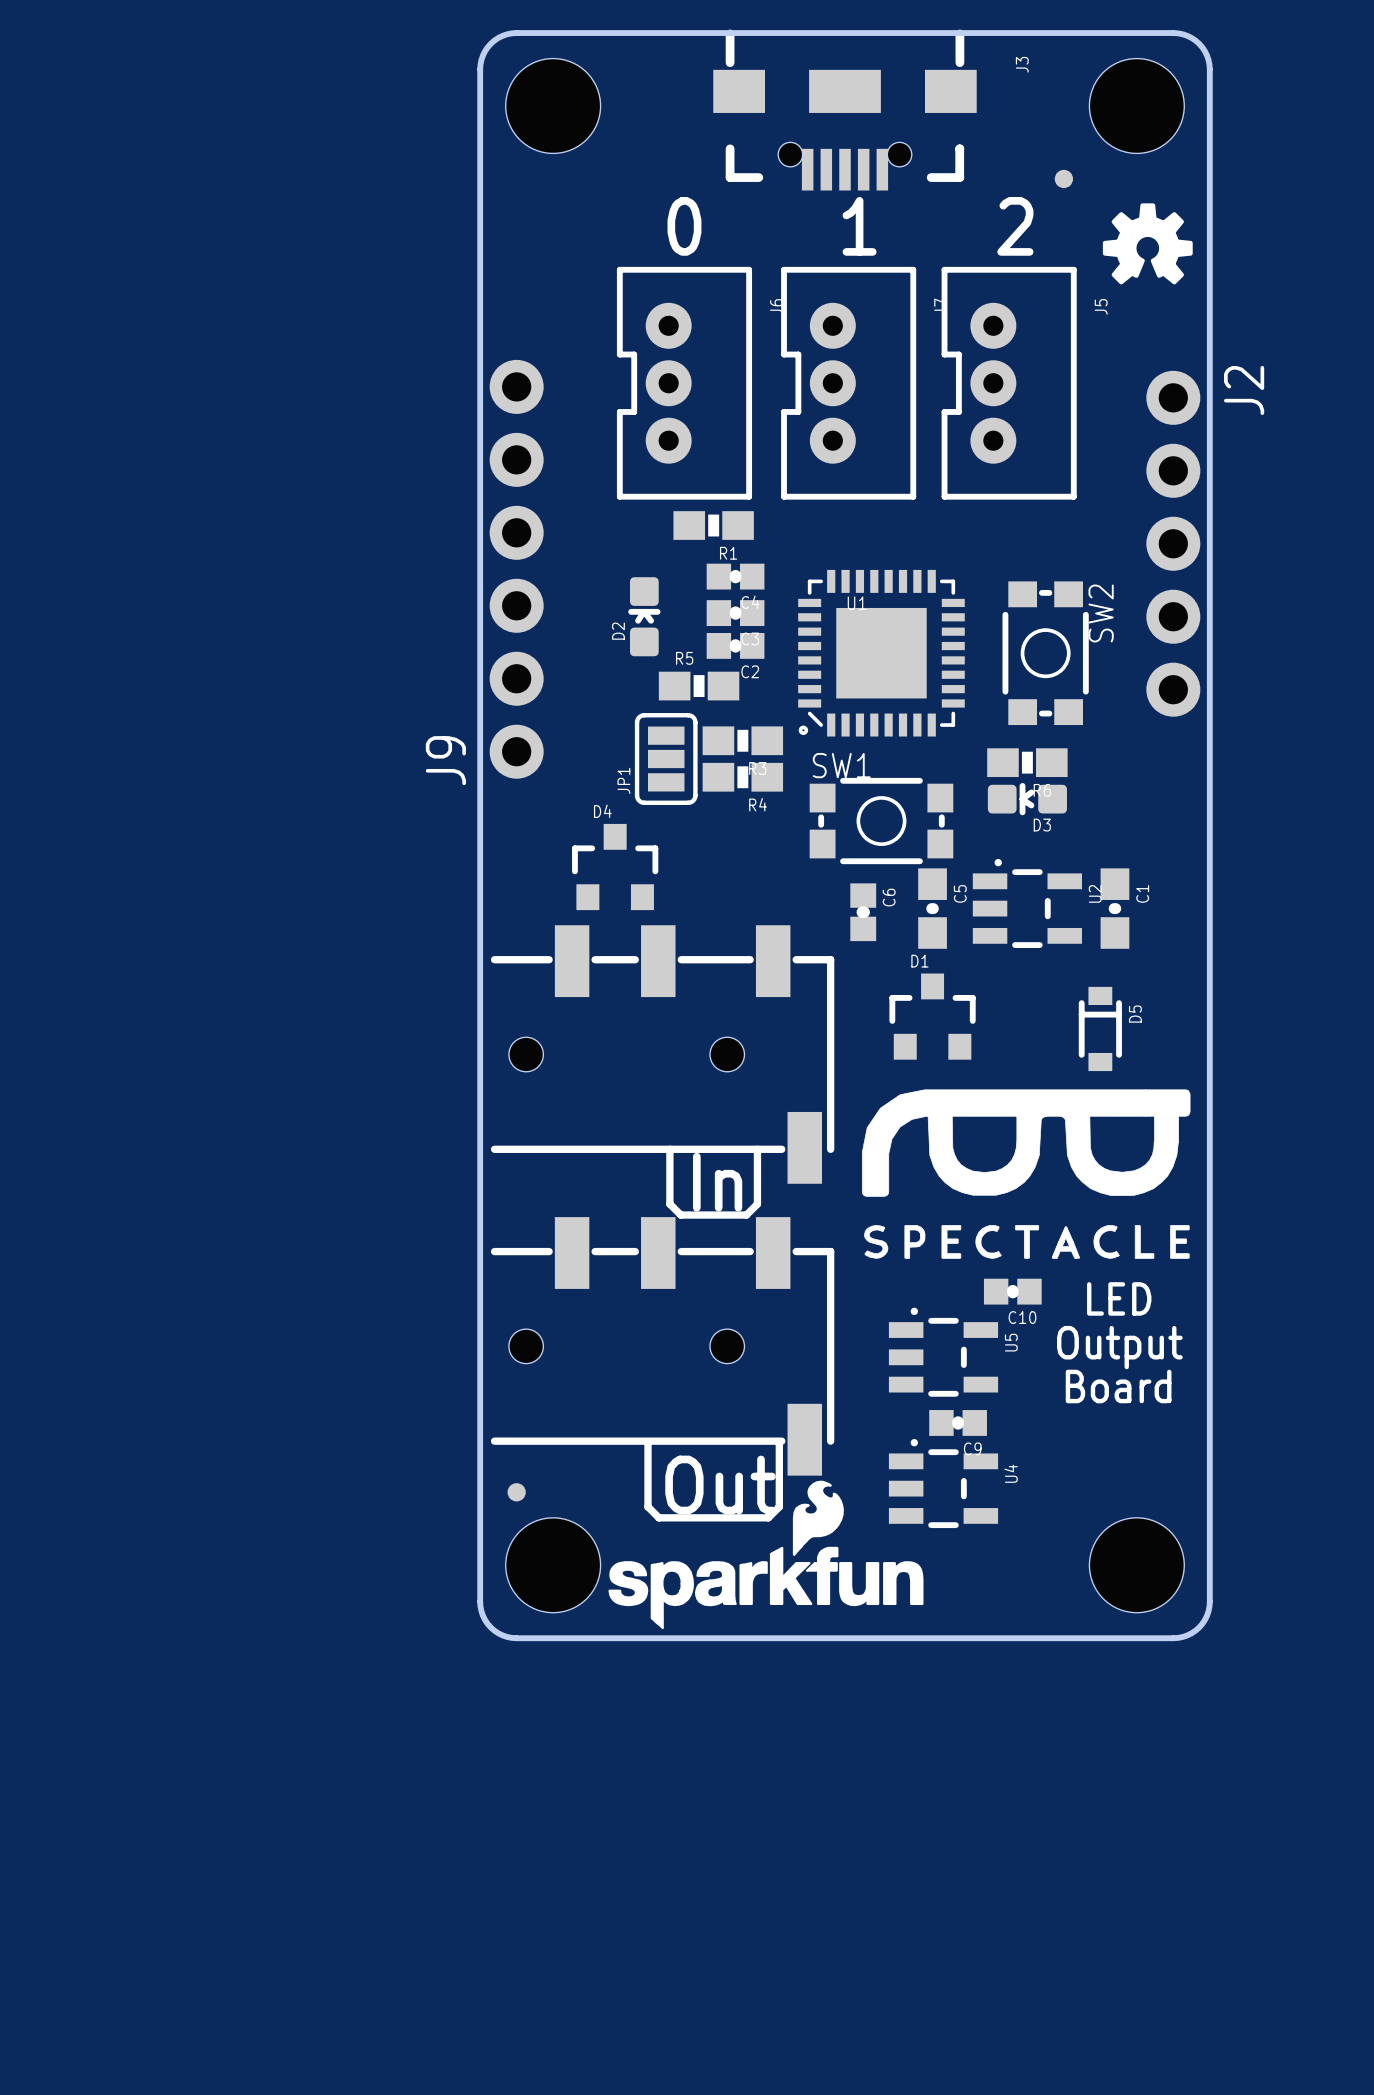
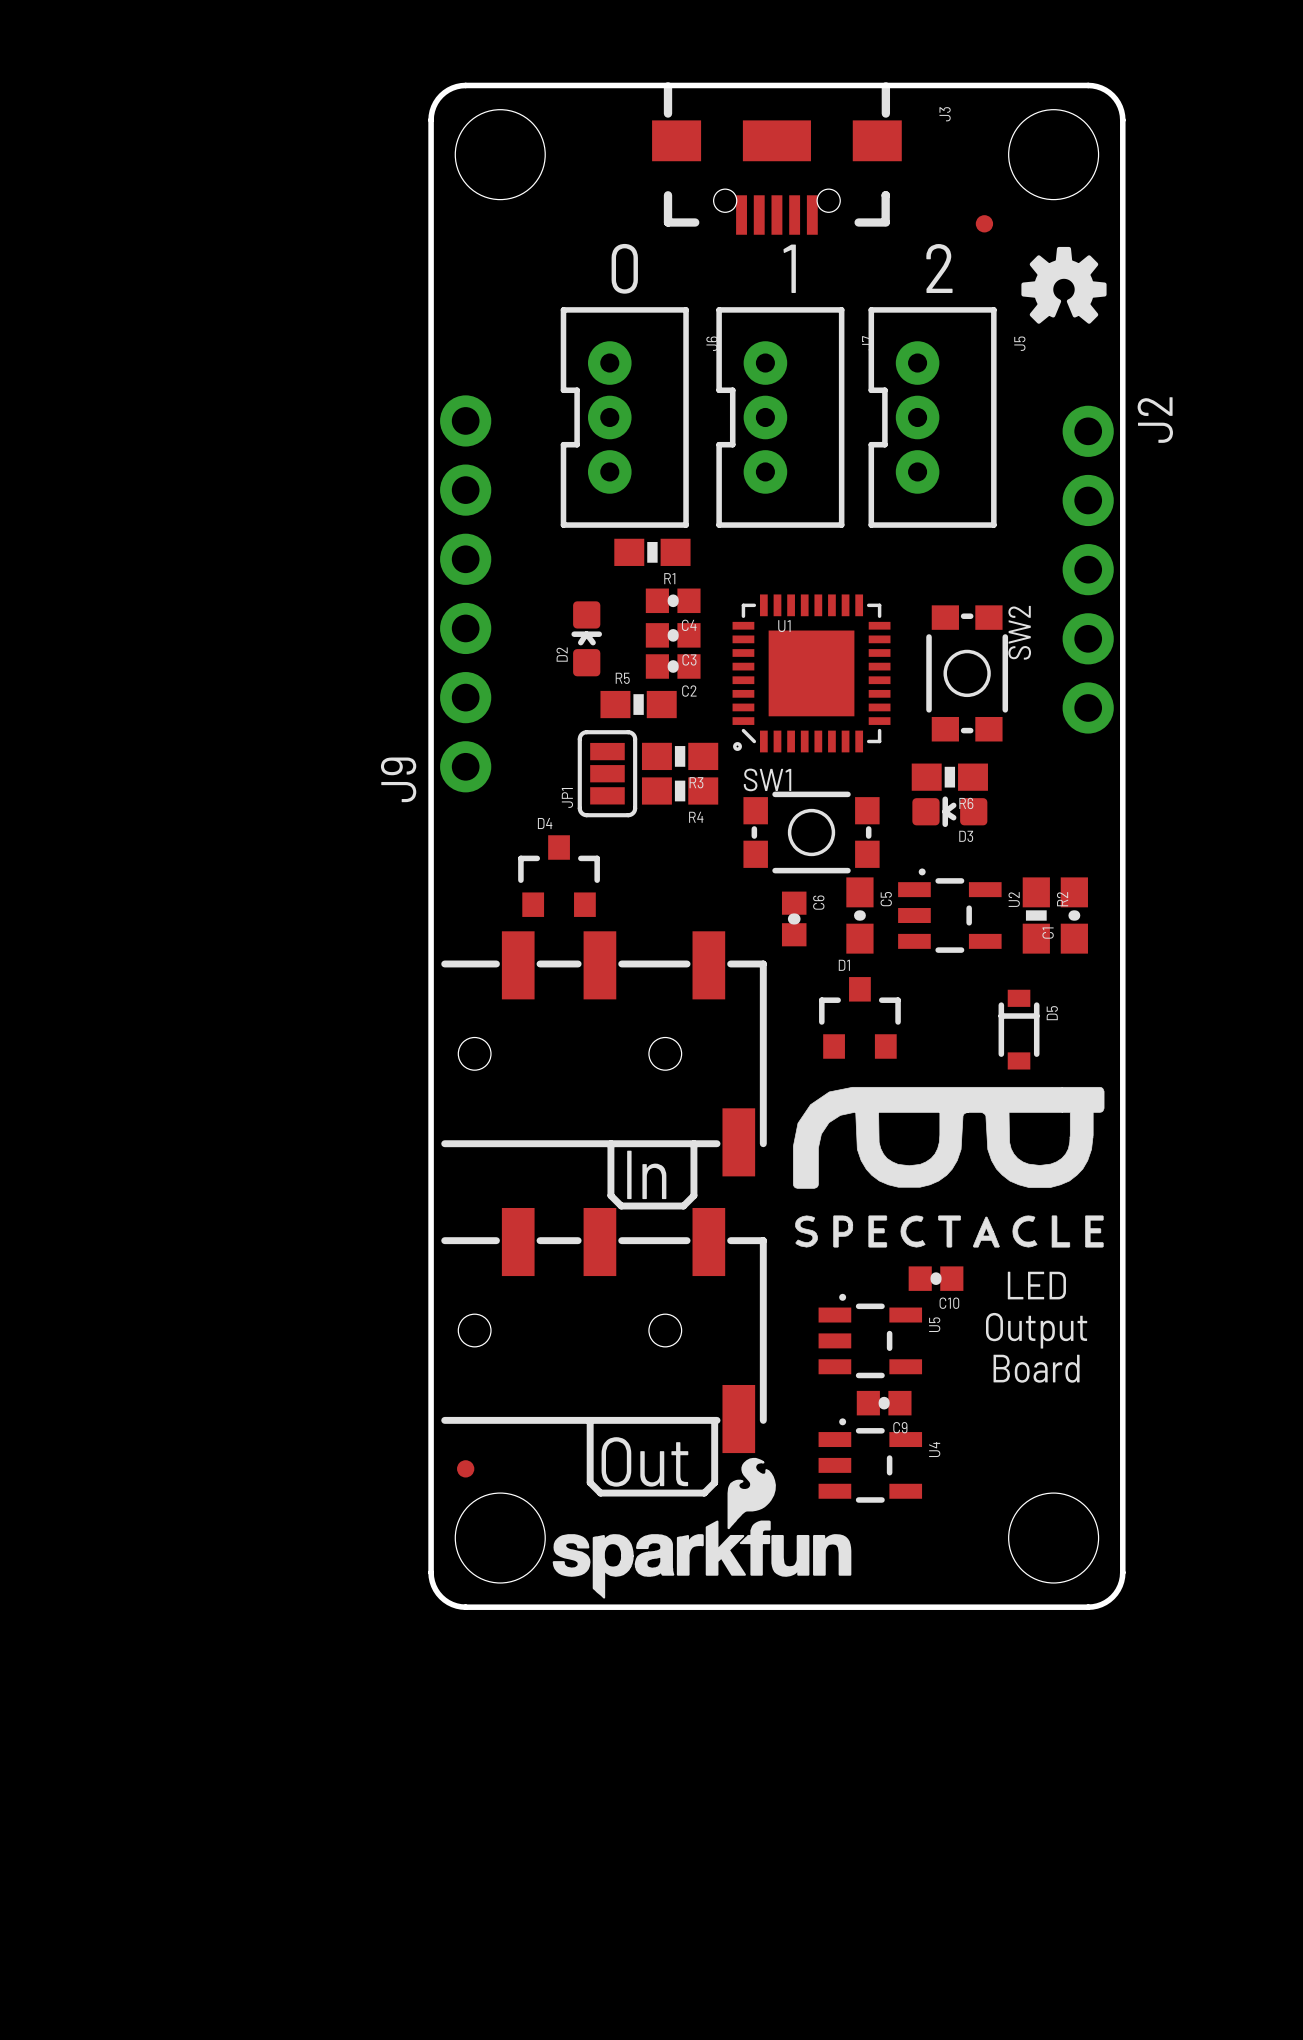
C1 name position: C1 (1142, 893) -> C1 (1048, 933)
C1 position: (1114, 908) -> (1074, 915)
R2: none -> (1036, 915)

